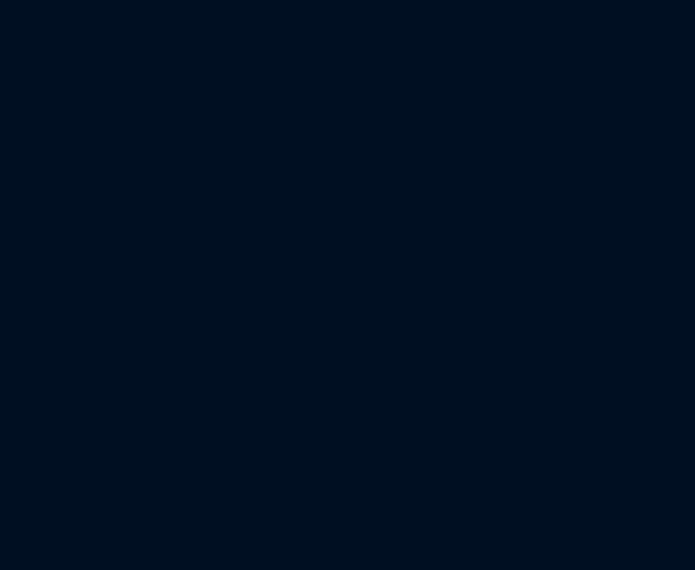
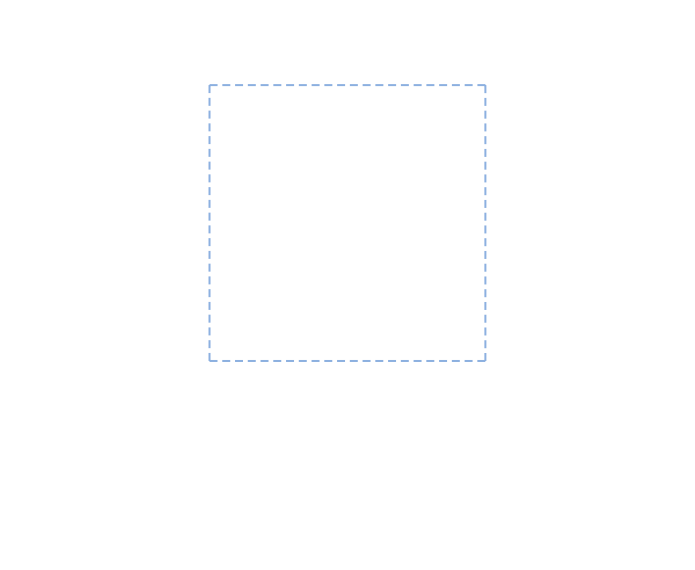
bottom zone outline: none -> (485, 85) (485, 360) (209, 360) (209, 85) (485, 85)

